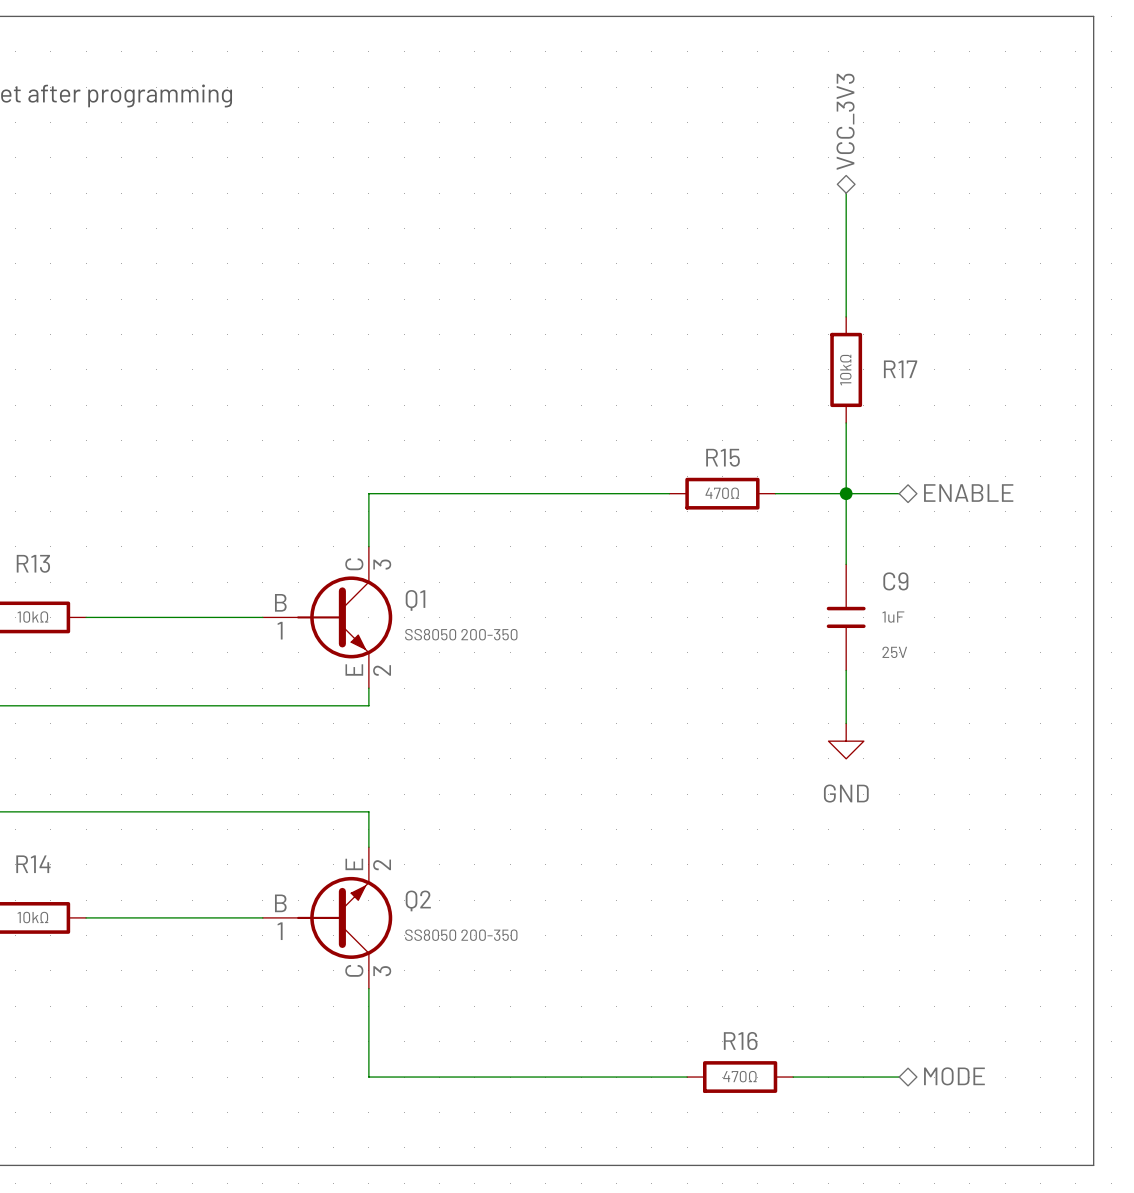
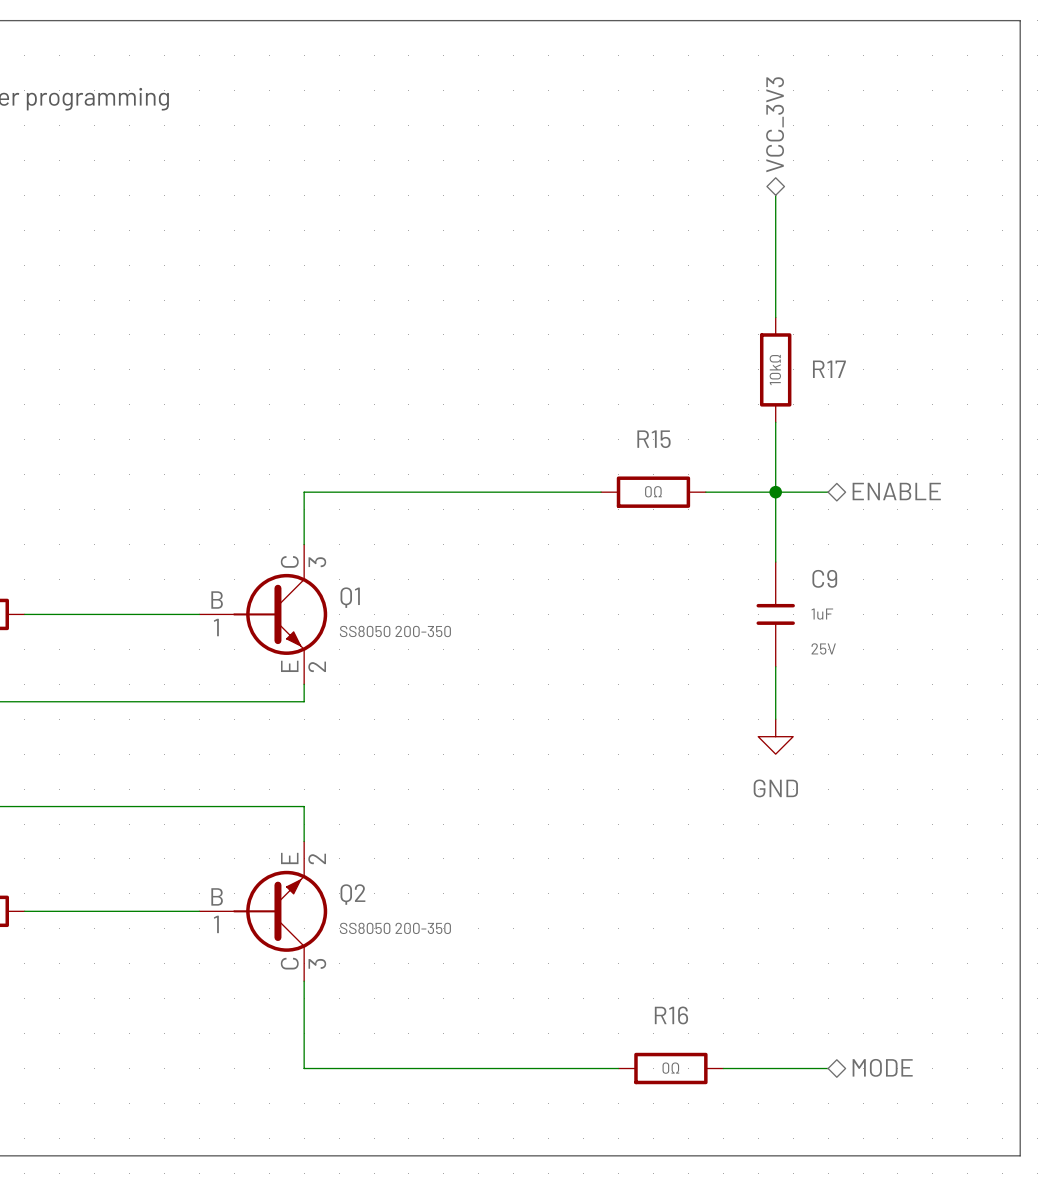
R15 name position: R15 (723, 457) -> R15 (654, 439)
R15 value: 470Ω (722, 493) -> 0Ω (653, 491)
R16 name position: R16 (740, 1040) -> R16 (671, 1015)
R16 value: 470Ω (739, 1076) -> 0Ω (670, 1068)

